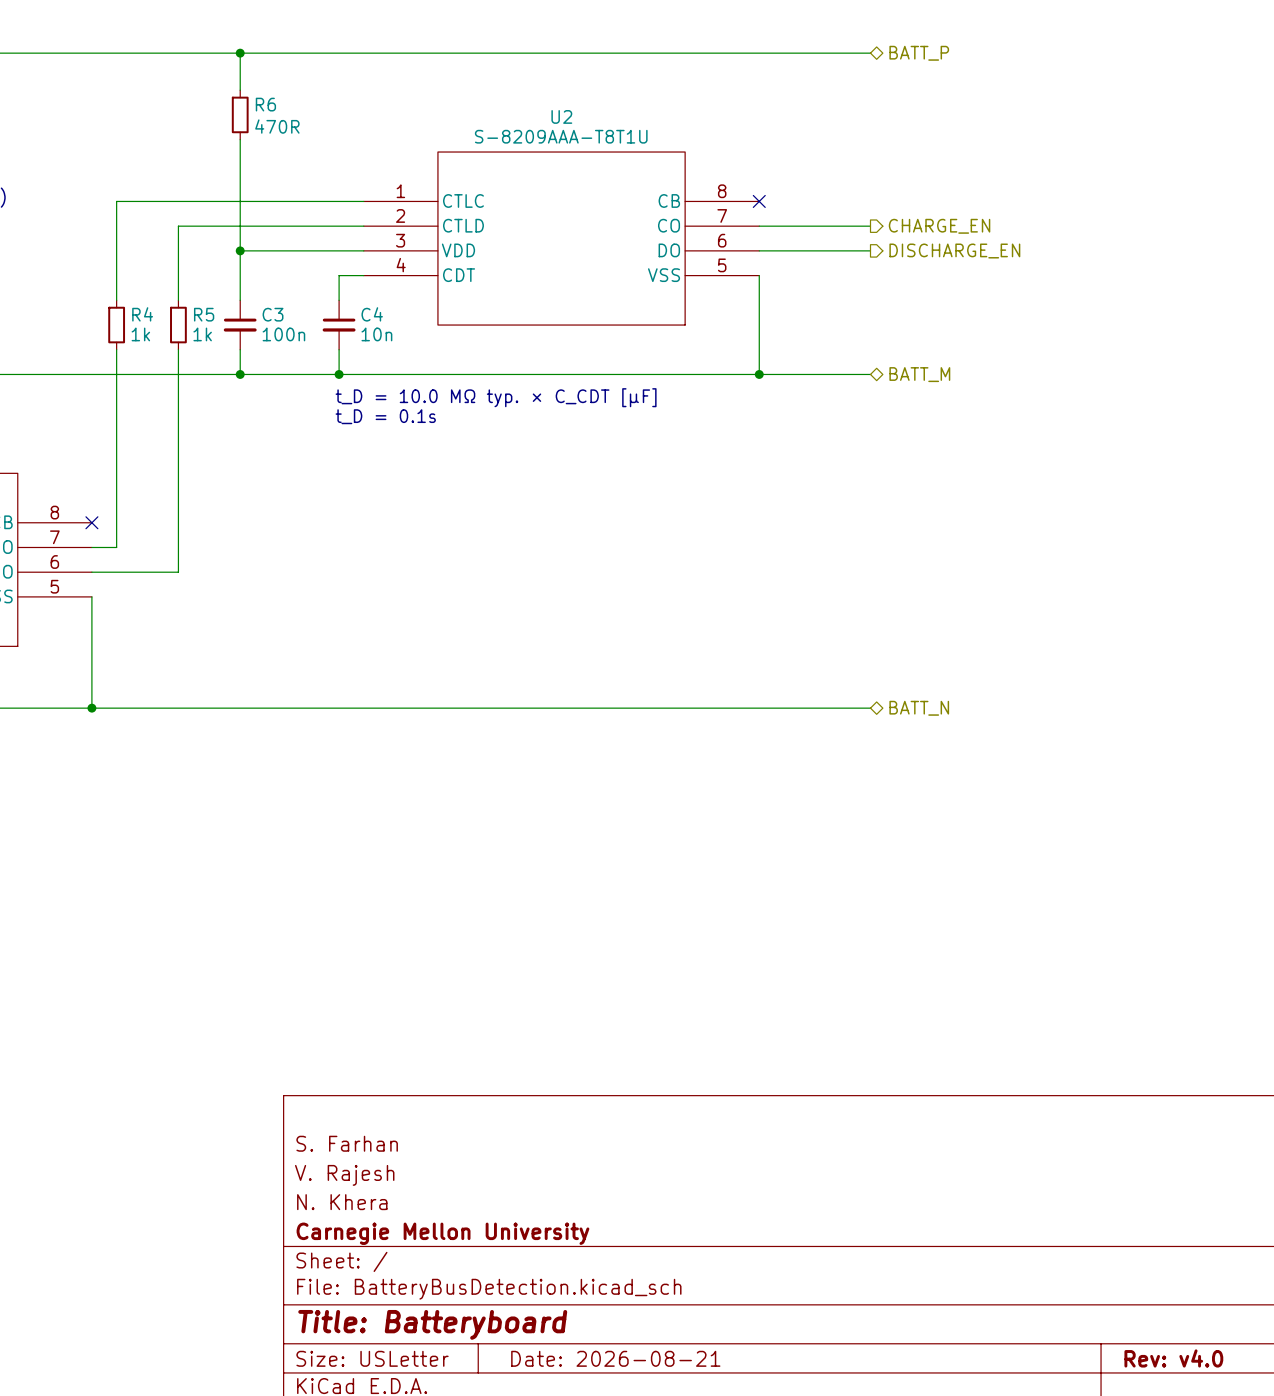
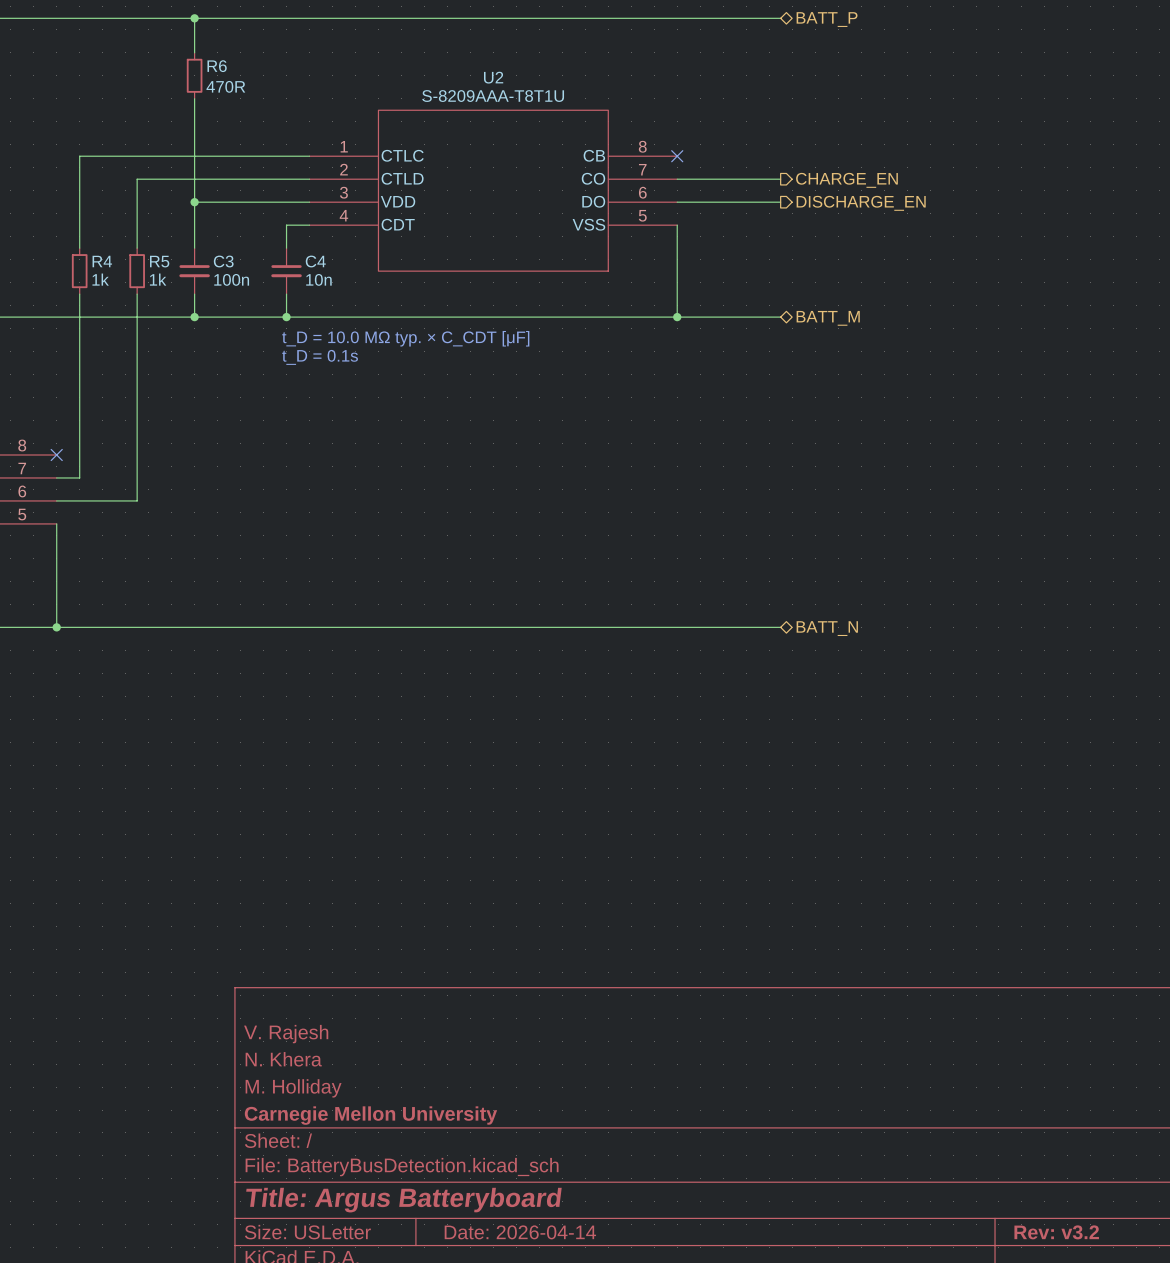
title block: S. Farhan (347, 1143) -> V. Rajesh (286, 1034)
title block: V. Rajesh (344, 1175) -> N. Khera (283, 1059)
title block: N. Khera (342, 1202) -> M. Holliday (293, 1088)
title block: Title: Batteryboard (432, 1324) -> Title: Argus Batteryboard (403, 1200)
title block: Date: 2026-08-21 (615, 1358) -> Date: 2026-04-14 (520, 1232)
title block: Rev: v4.0 (1173, 1358) -> Rev: v3.2 (1056, 1232)

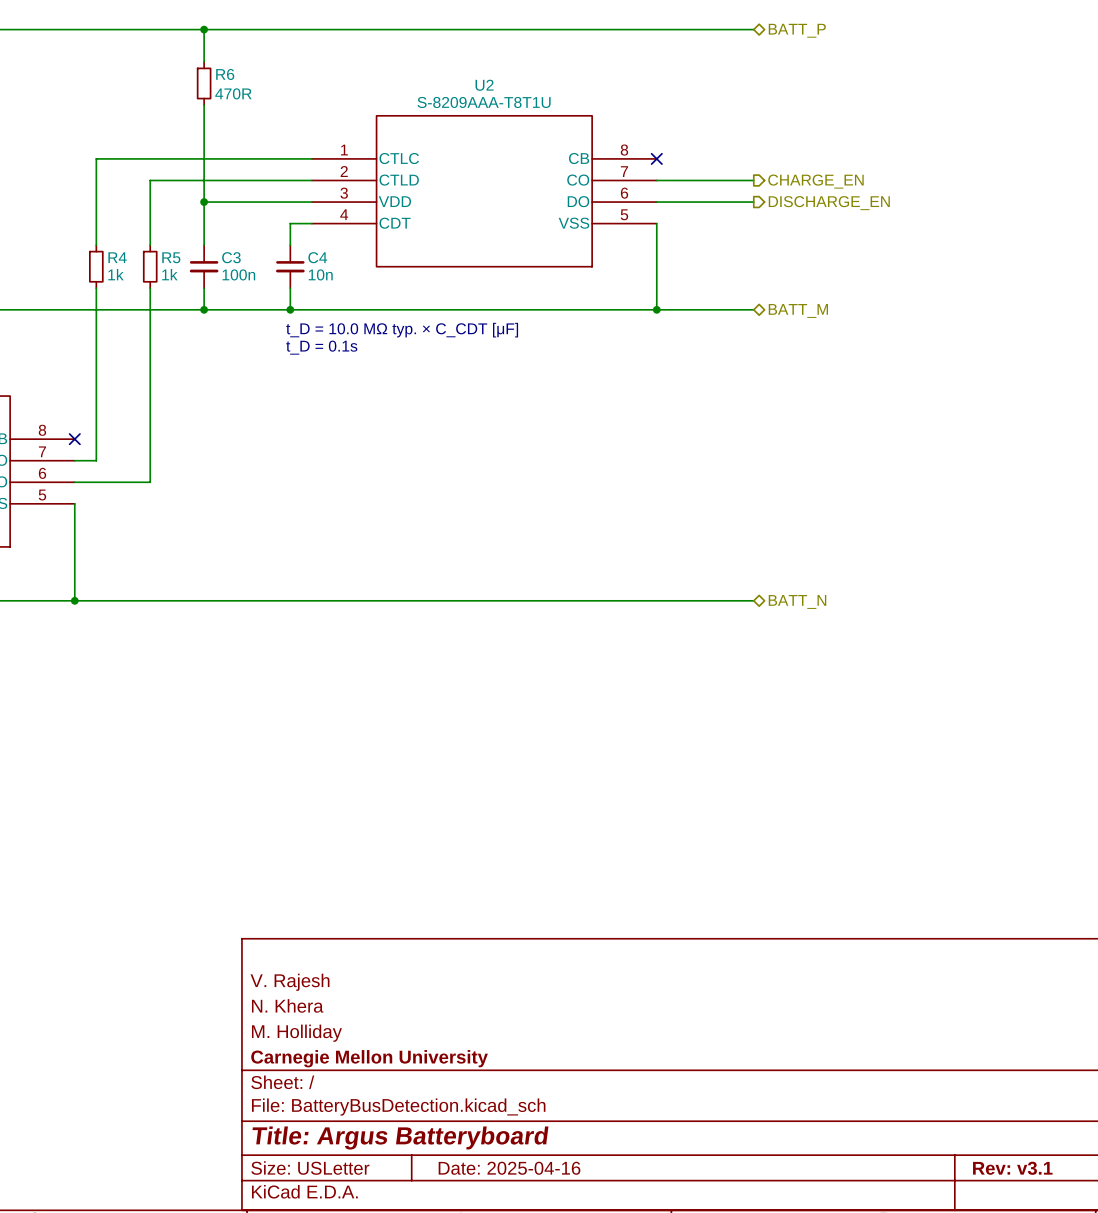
title block: Date: 2026-04-14 (520, 1232) -> Date: 2025-04-16 (509, 1168)
title block: Rev: v3.2 (1056, 1232) -> Rev: v3.1 (1012, 1168)

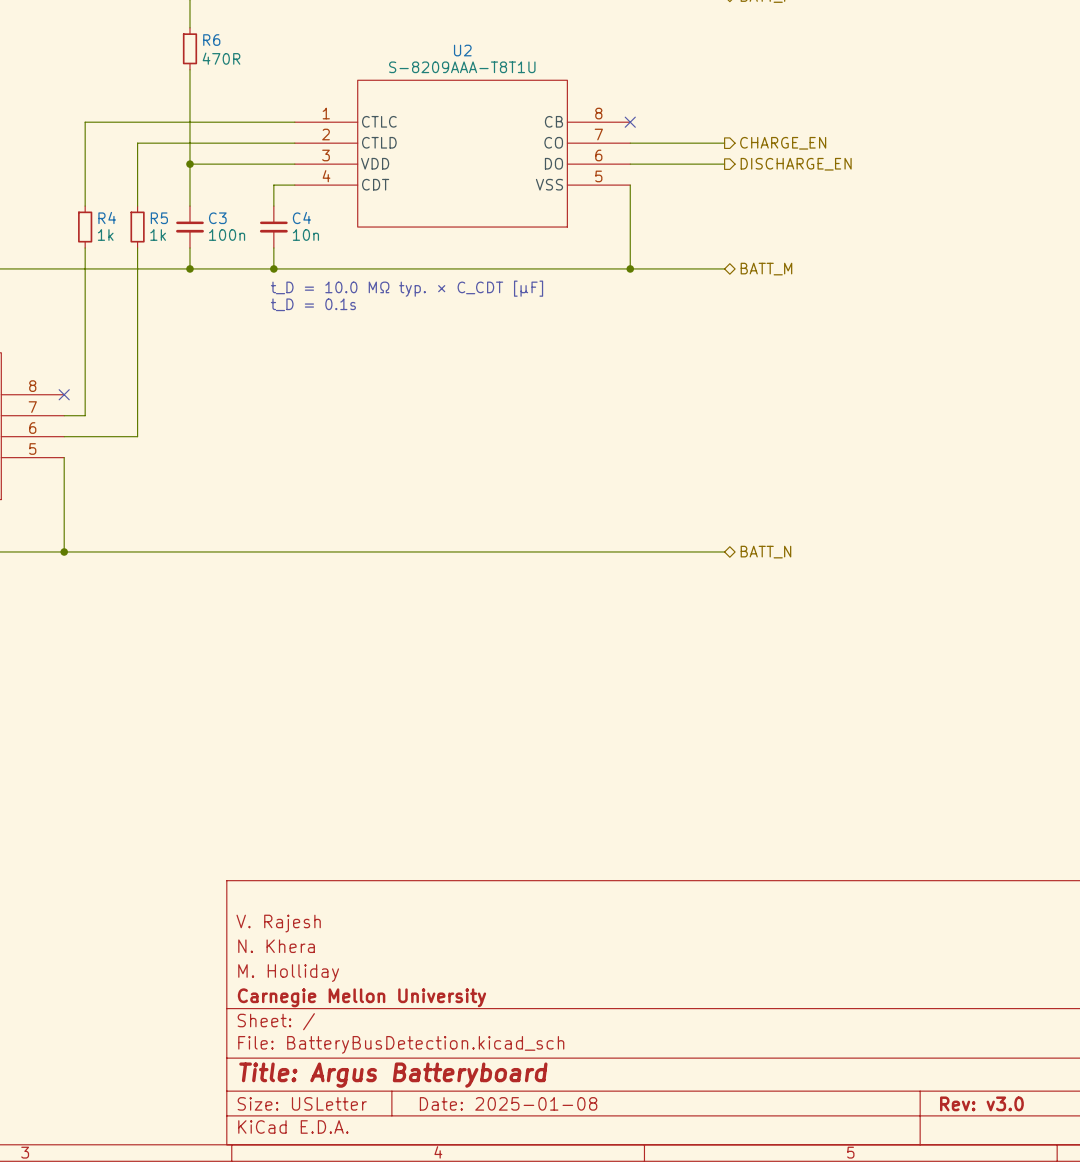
title block: Date: 2025-04-16 (509, 1168) -> Date: 2025-01-08 (508, 1103)
title block: Rev: v3.1 (1012, 1168) -> Rev: v3.0 (981, 1103)

